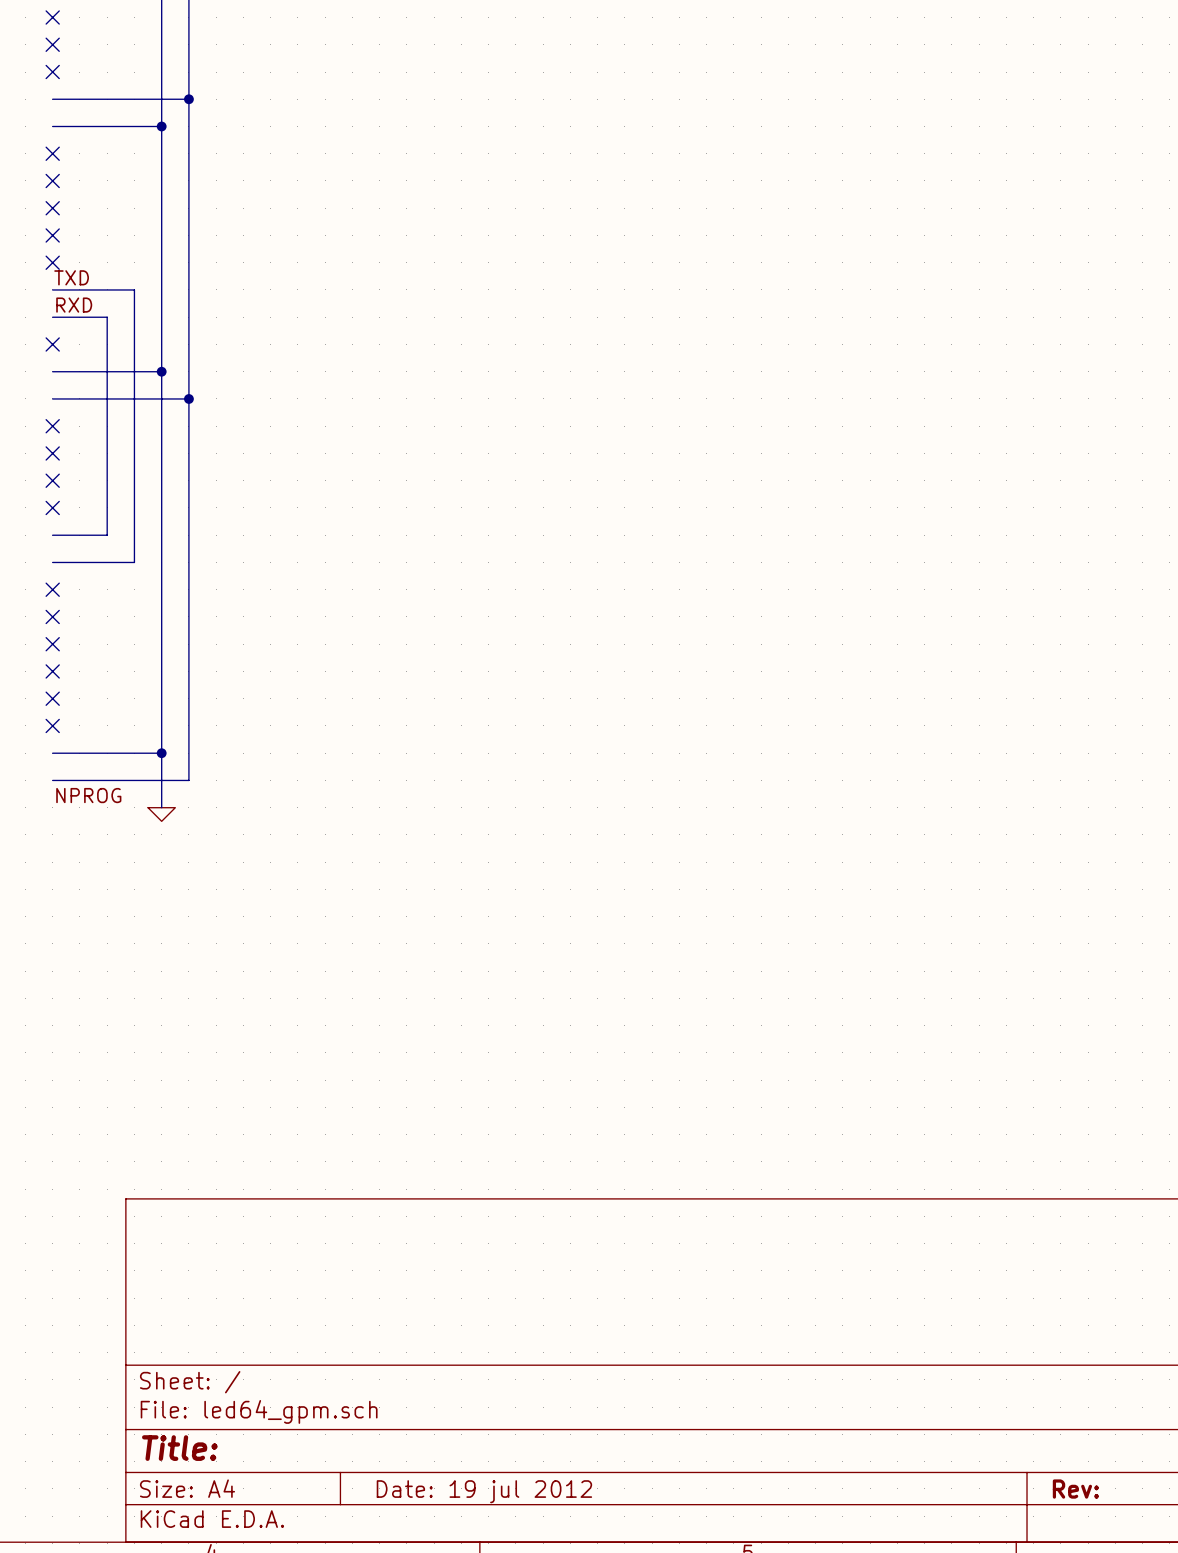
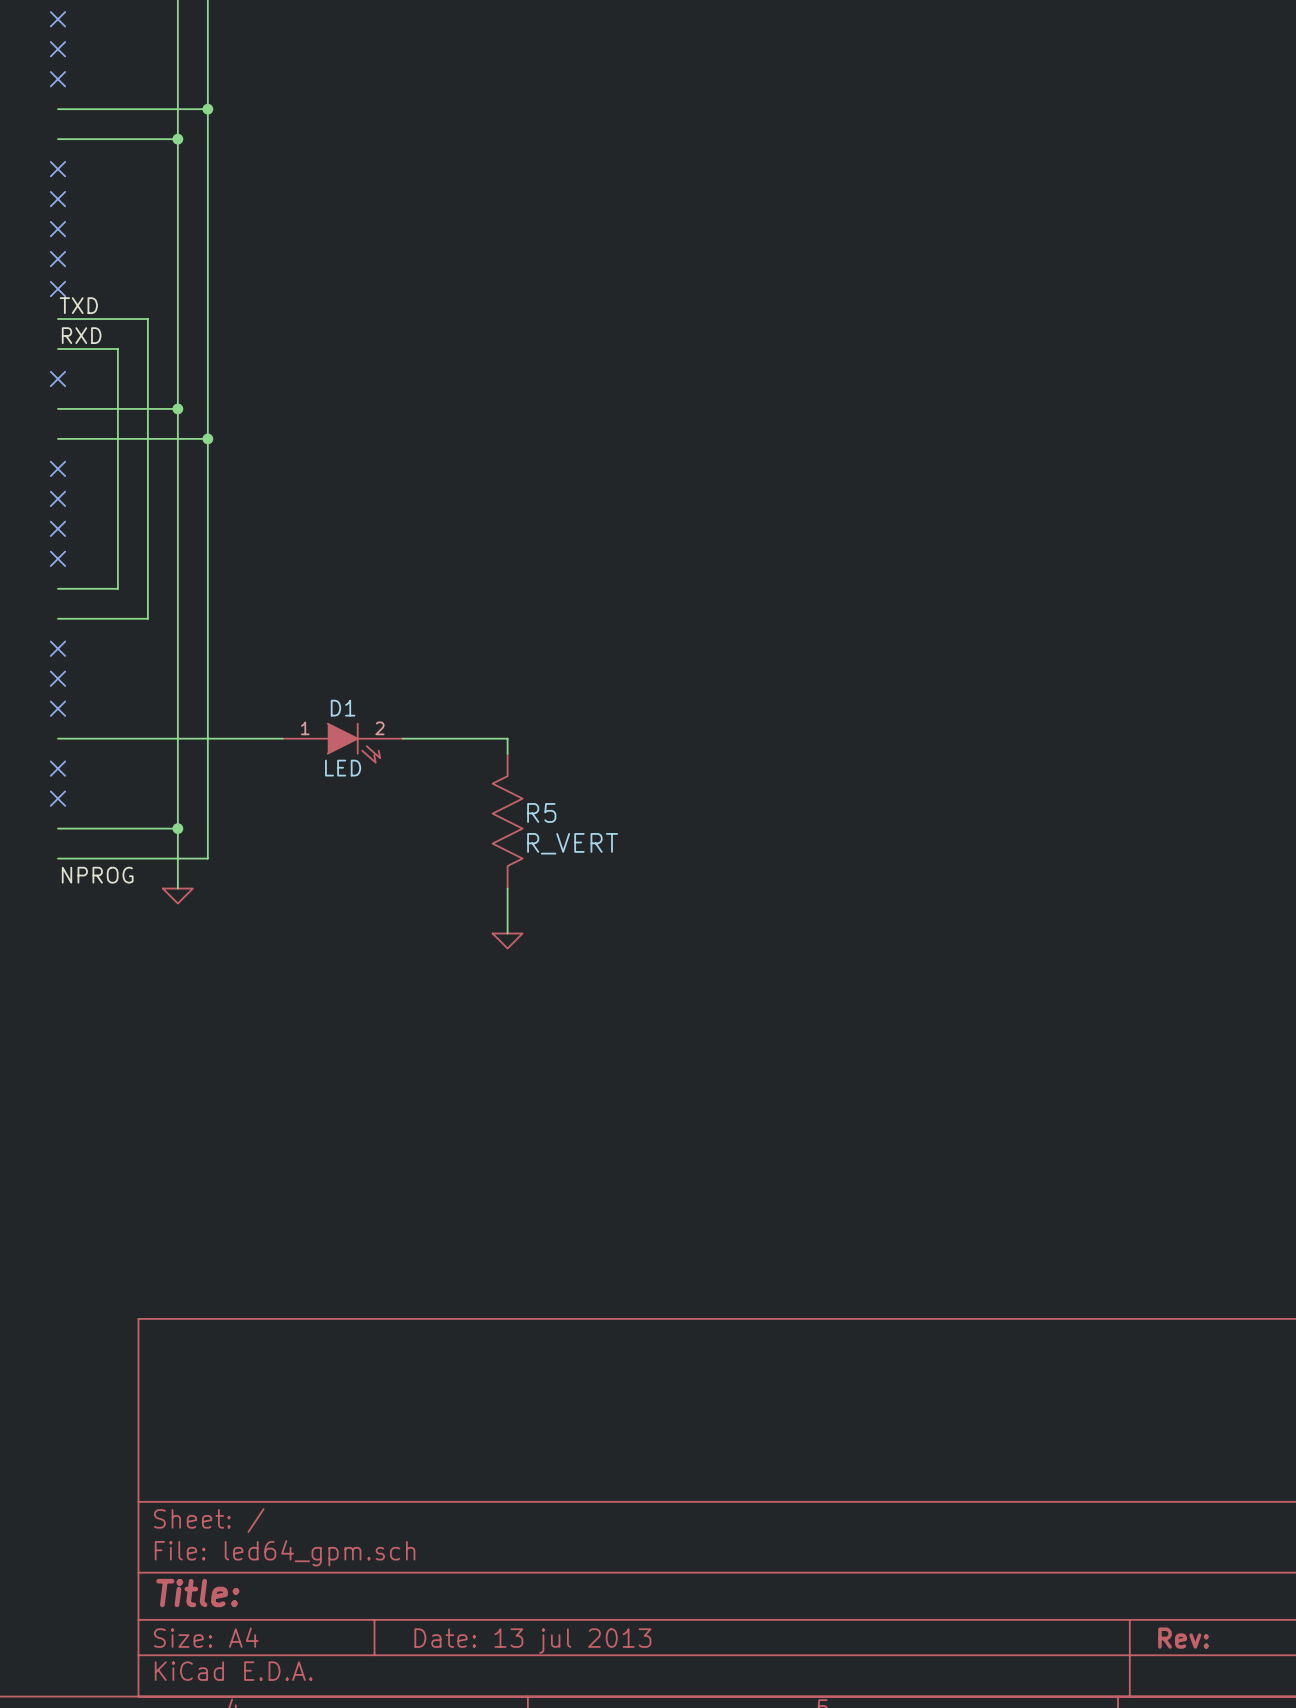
wire: none -> (57, 738) (282, 738)
no-connect mark: (52, 671) -> none
wire: none -> (402, 738) (507, 738) (507, 753)
D1: none -> LED (342, 743)
R5: none -> R_VERT (507, 821)
wire: none -> (507, 888) (507, 933)
power symbol: none -> (507, 941)
title block: Date: 19 jul 2012 (484, 1491) -> Date: 13 jul 2013 (532, 1641)

